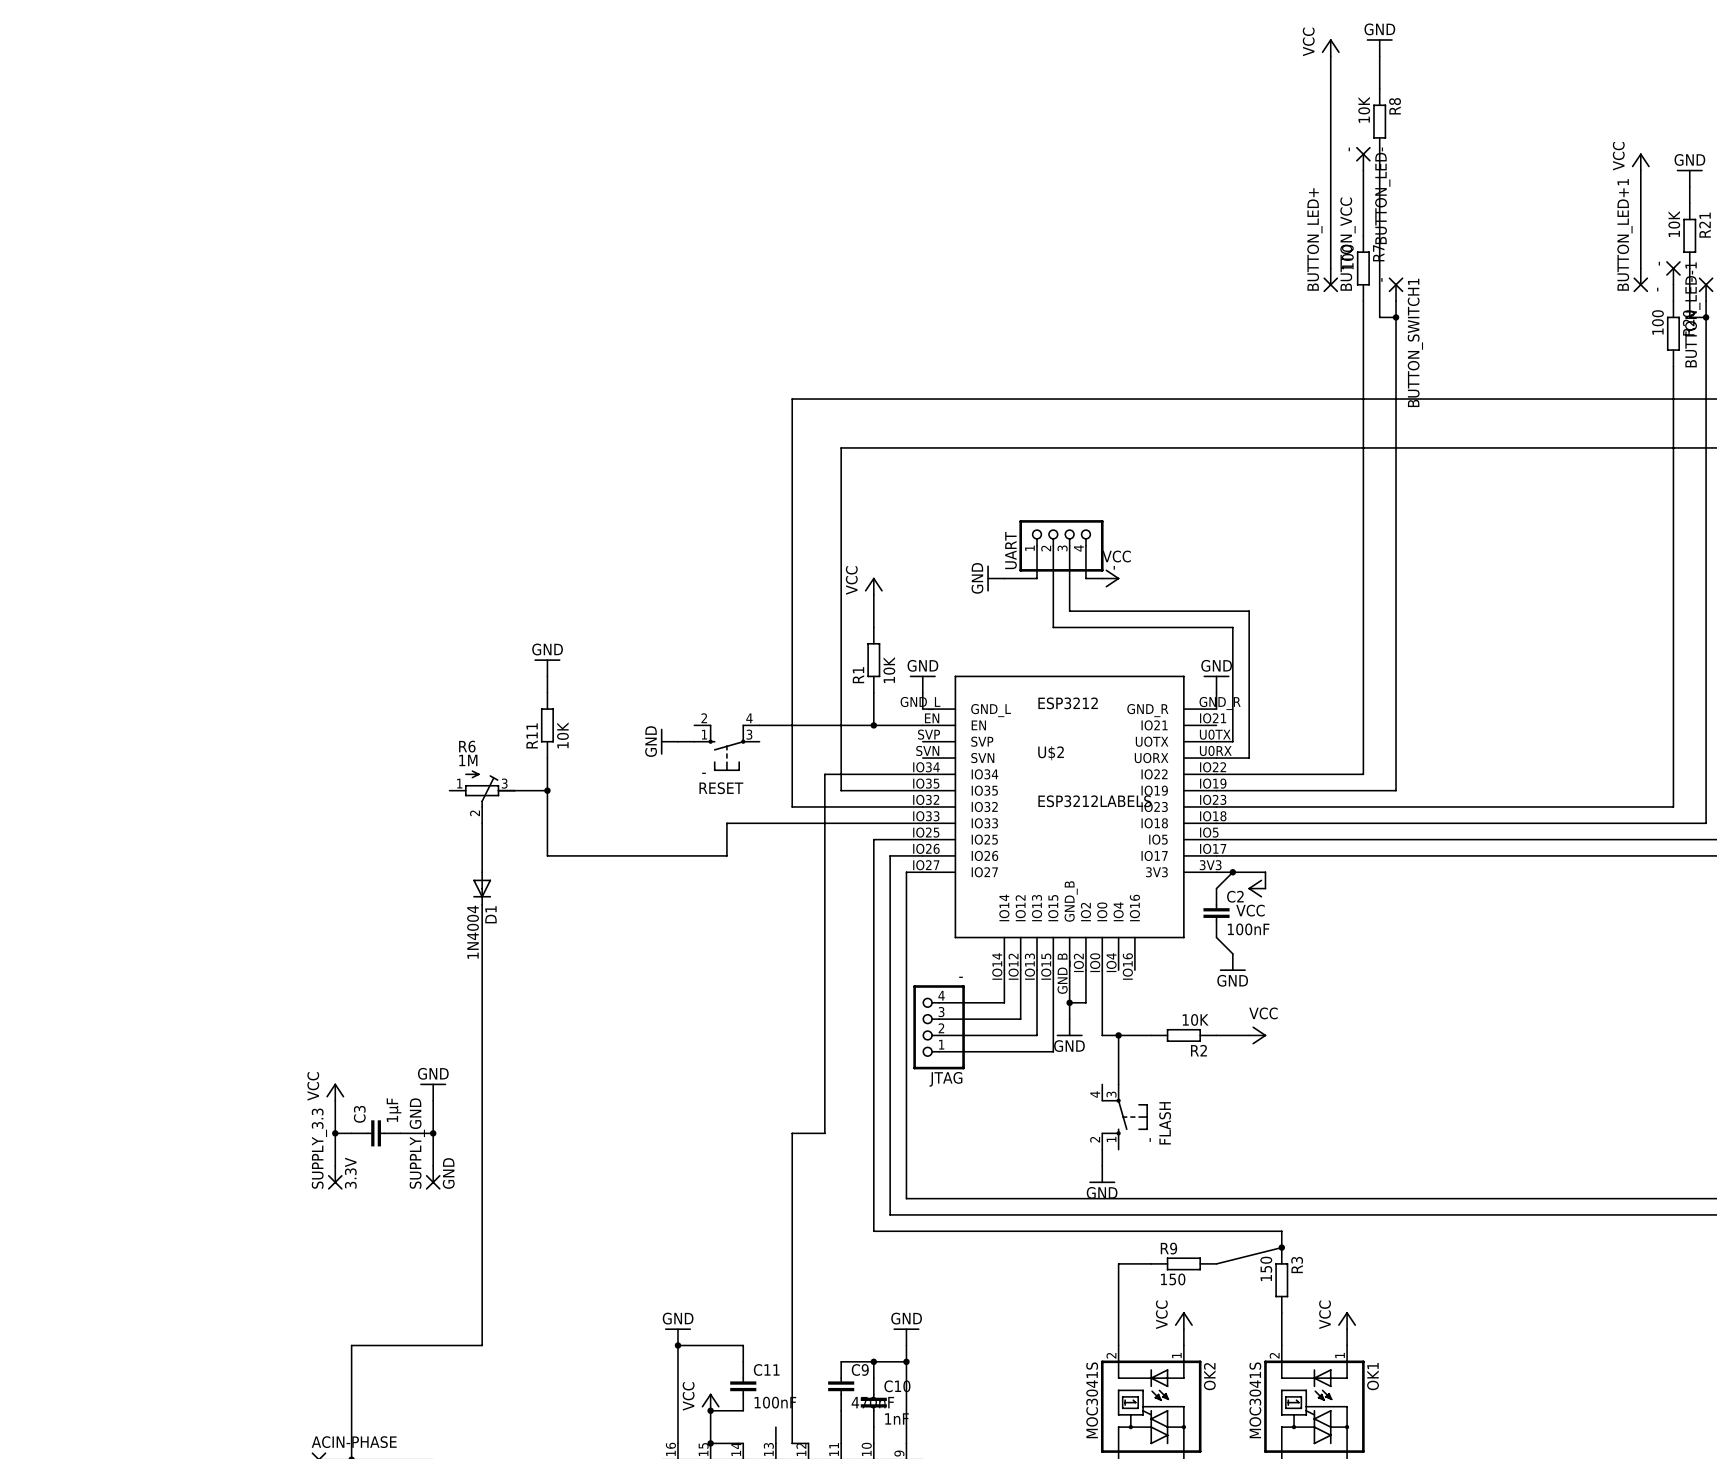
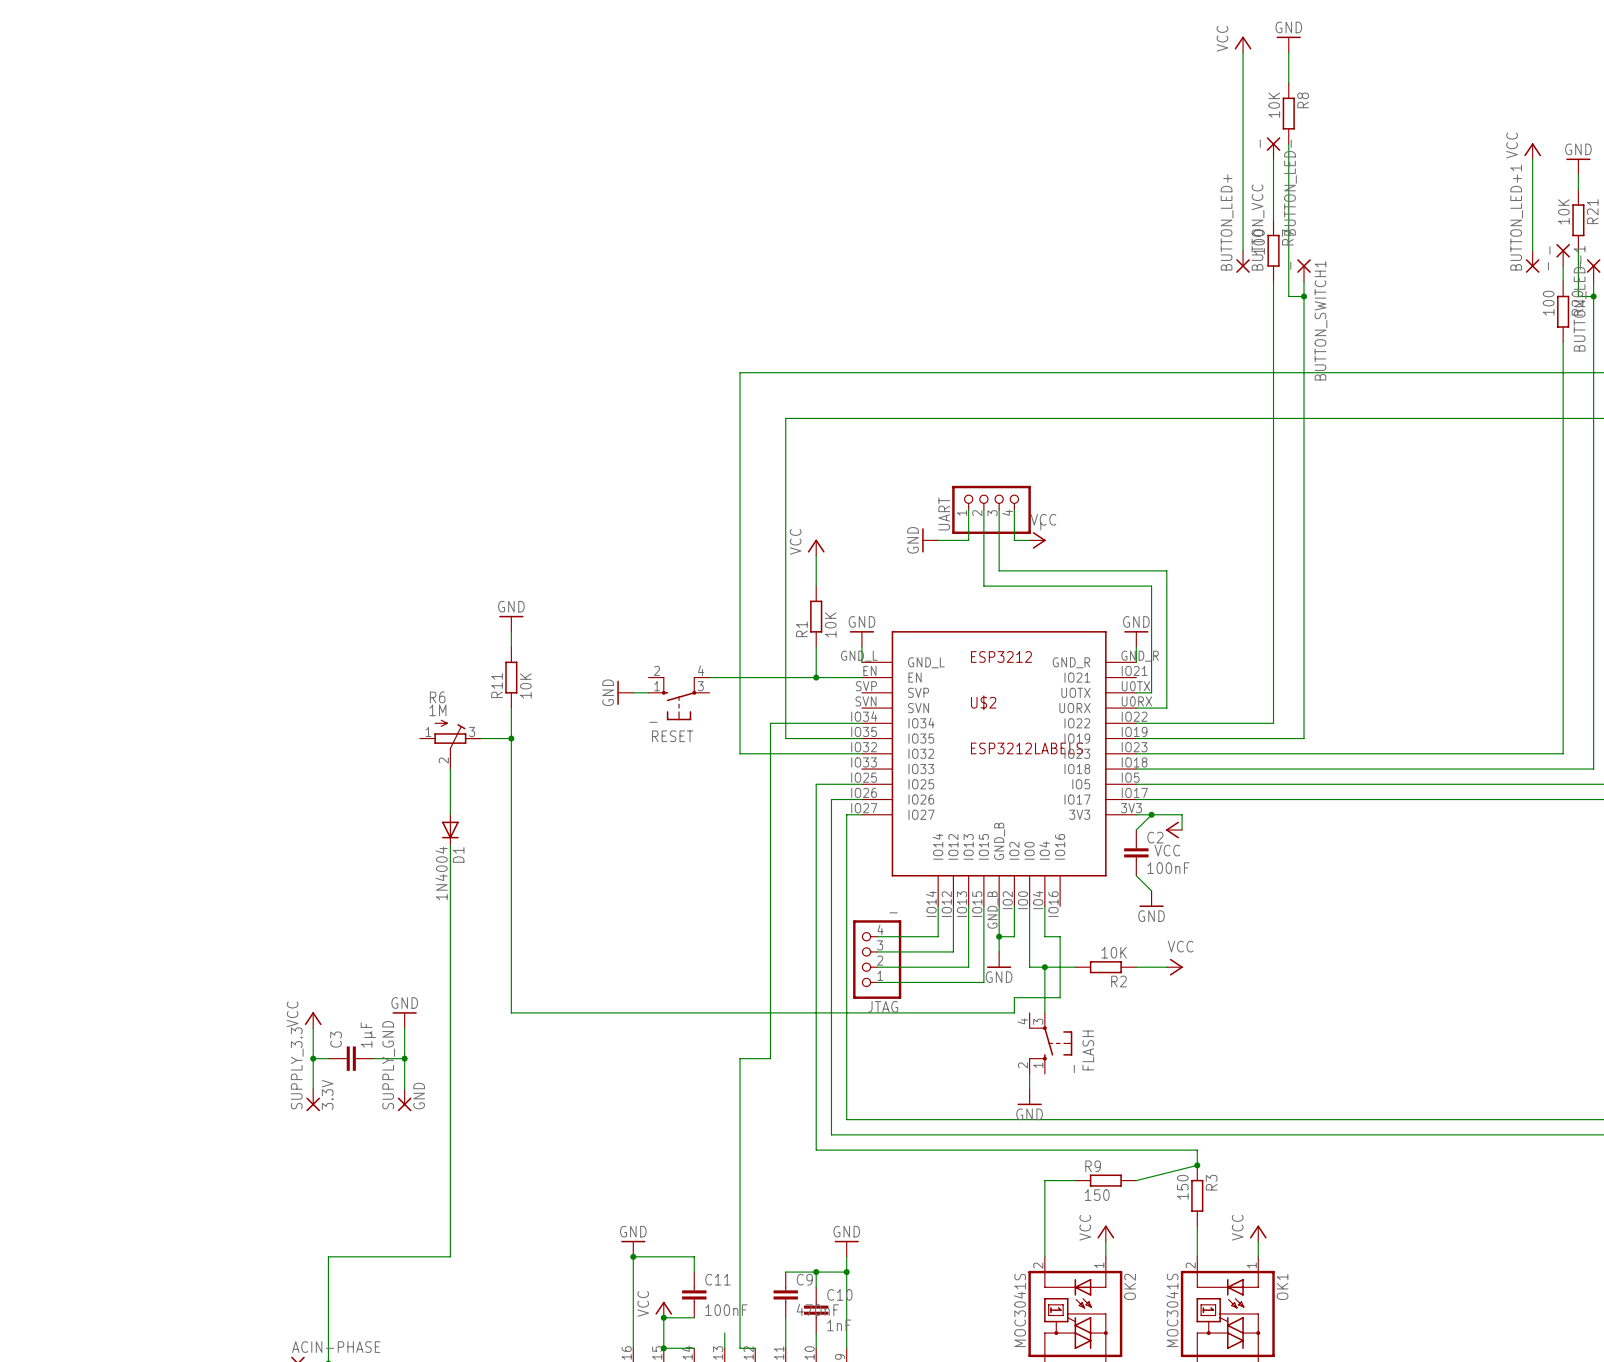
wire: (922, 823) (726, 823) (726, 855) (547, 855) -> (1044, 906) (1044, 936) (1060, 936) (1060, 997) (1014, 997) (1014, 1012) (511, 1012) (511, 799)

